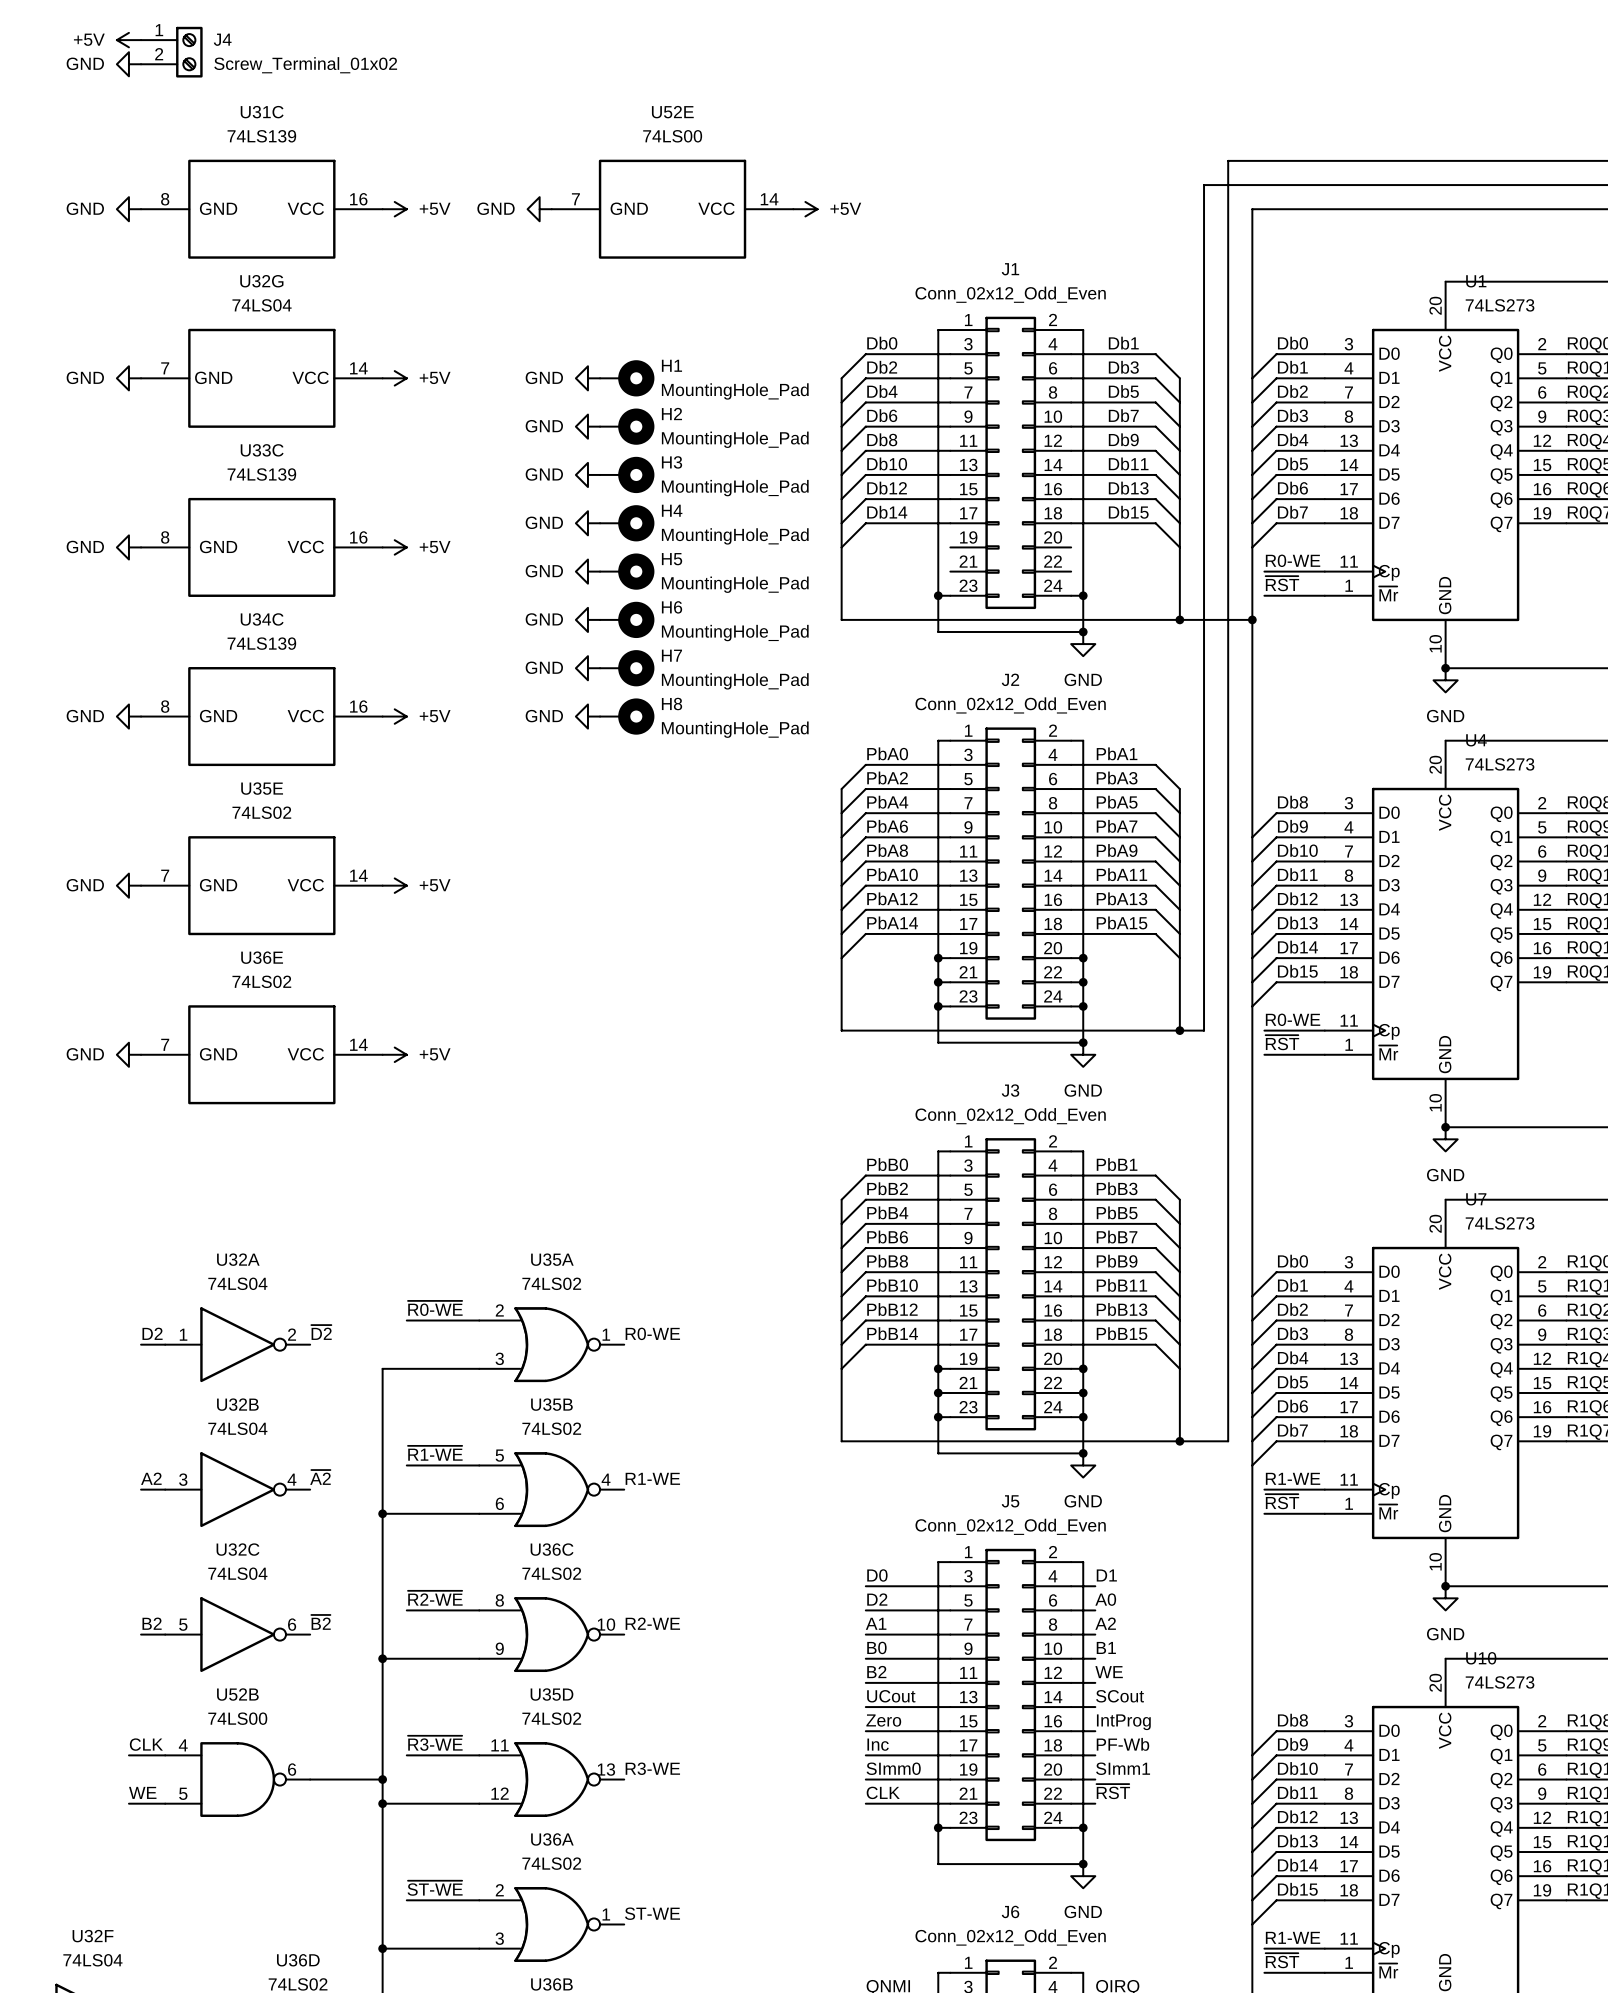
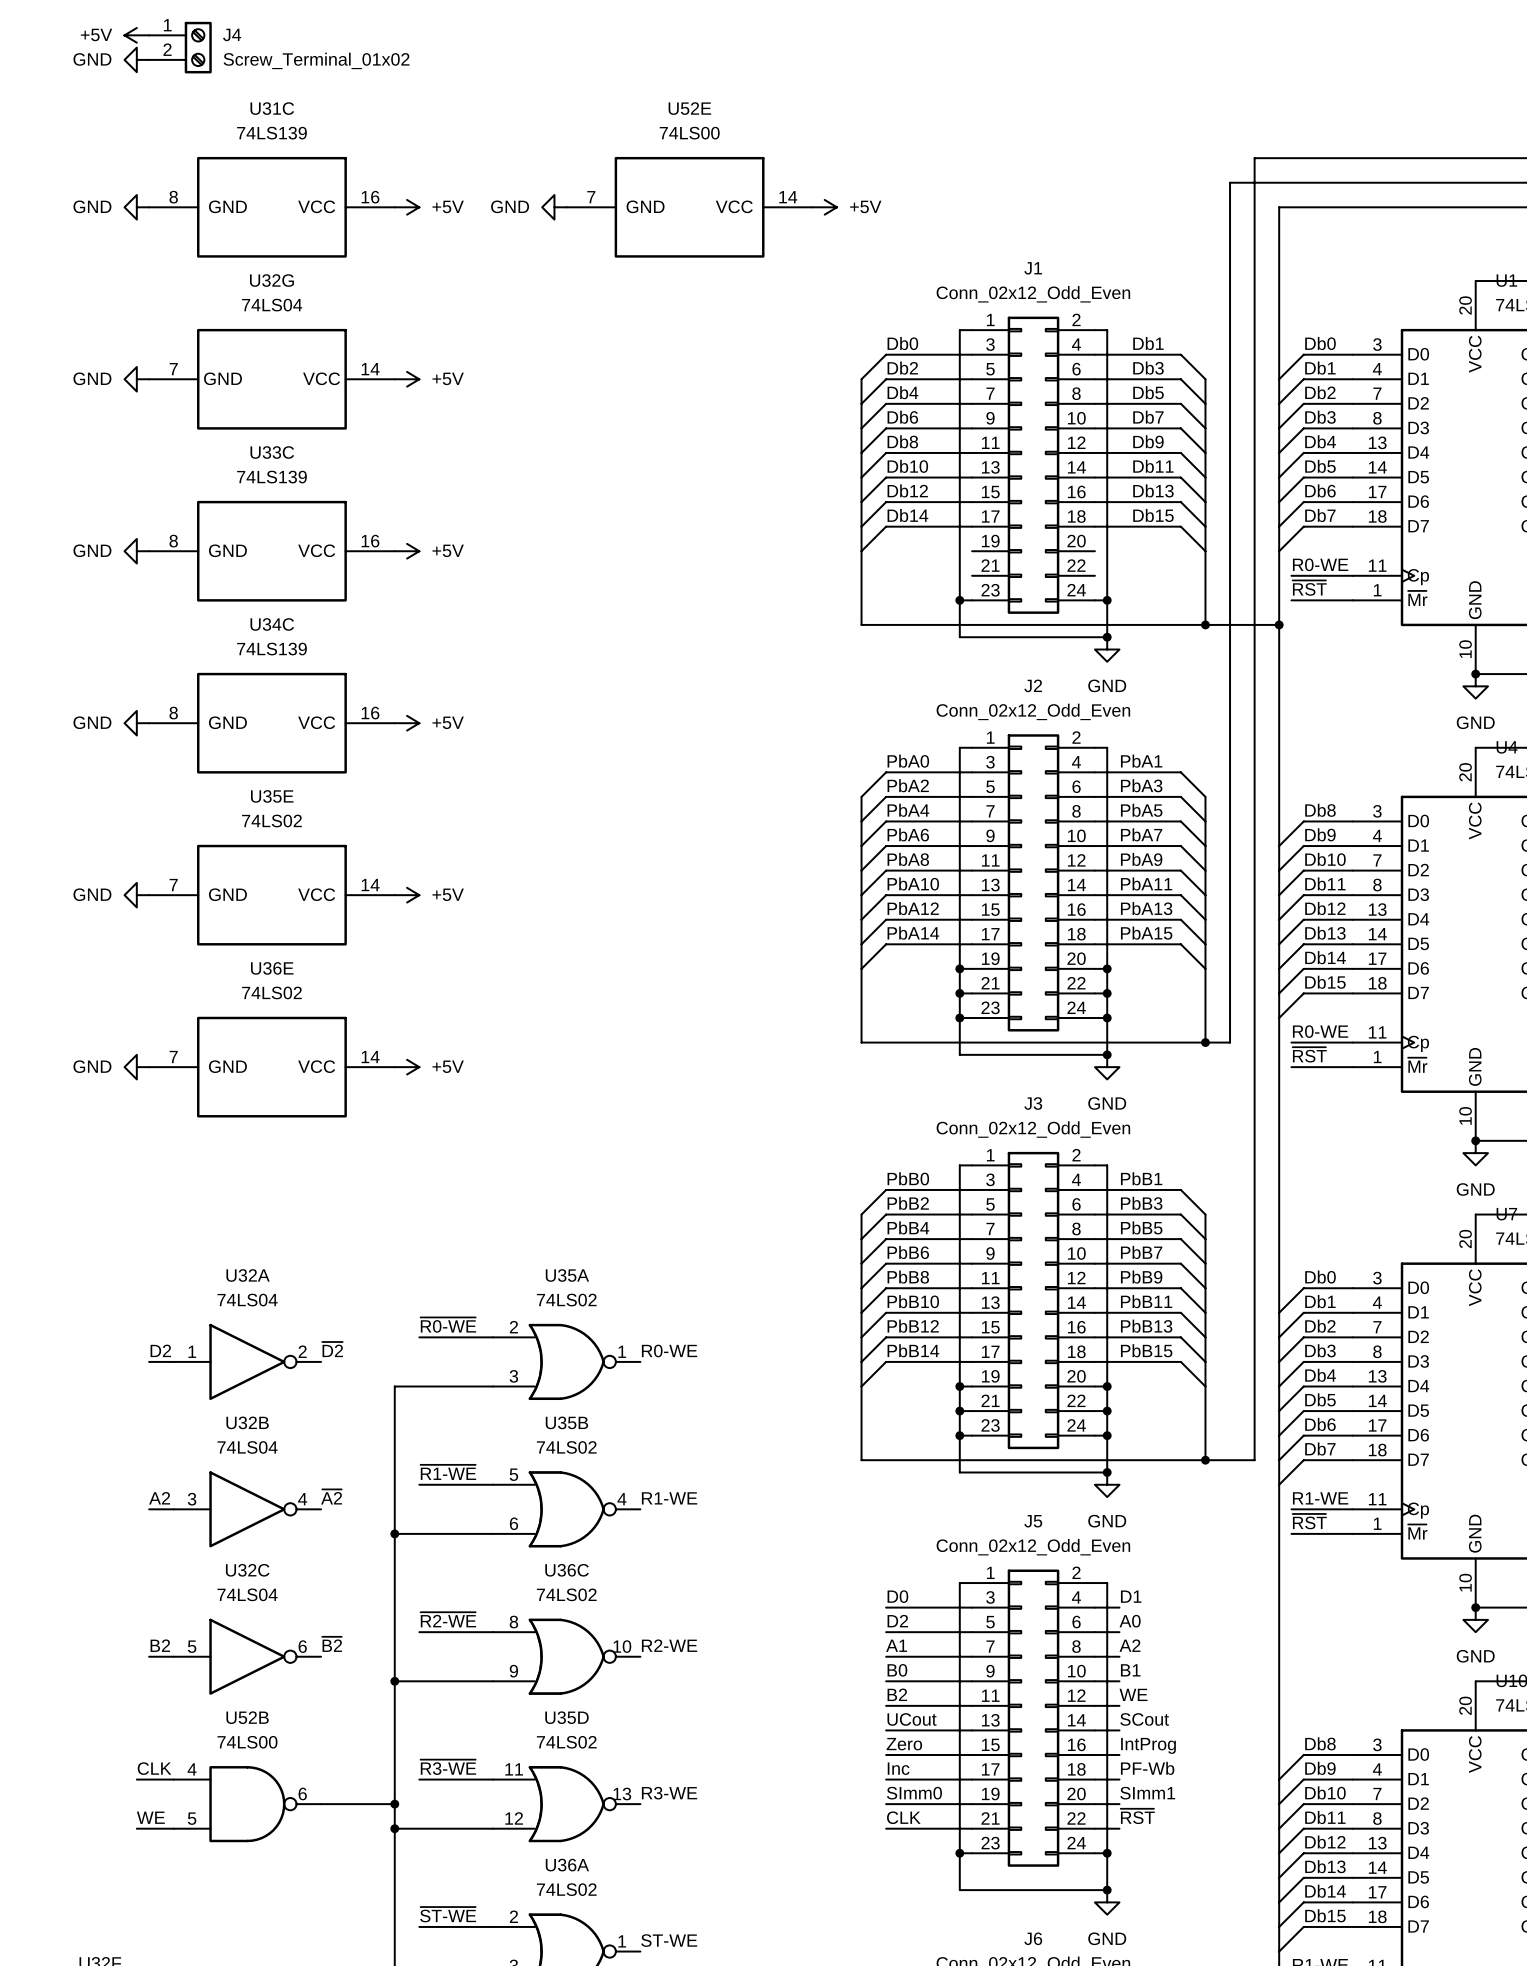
power symbol: GND (587, 378) -> none
H1: MountingHole_Pad (627, 378) -> none
power symbol: GND (587, 426) -> none
H2: MountingHole_Pad (627, 426) -> none
power symbol: GND (587, 474) -> none
H3: MountingHole_Pad (627, 474) -> none
power symbol: GND (587, 523) -> none
H4: MountingHole_Pad (627, 523) -> none
power symbol: GND (587, 571) -> none
H5: MountingHole_Pad (627, 571) -> none
power symbol: GND (587, 619) -> none
H6: MountingHole_Pad (627, 619) -> none
power symbol: GND (587, 668) -> none
H7: MountingHole_Pad (627, 668) -> none
power symbol: GND (587, 716) -> none
H8: MountingHole_Pad (627, 716) -> none

